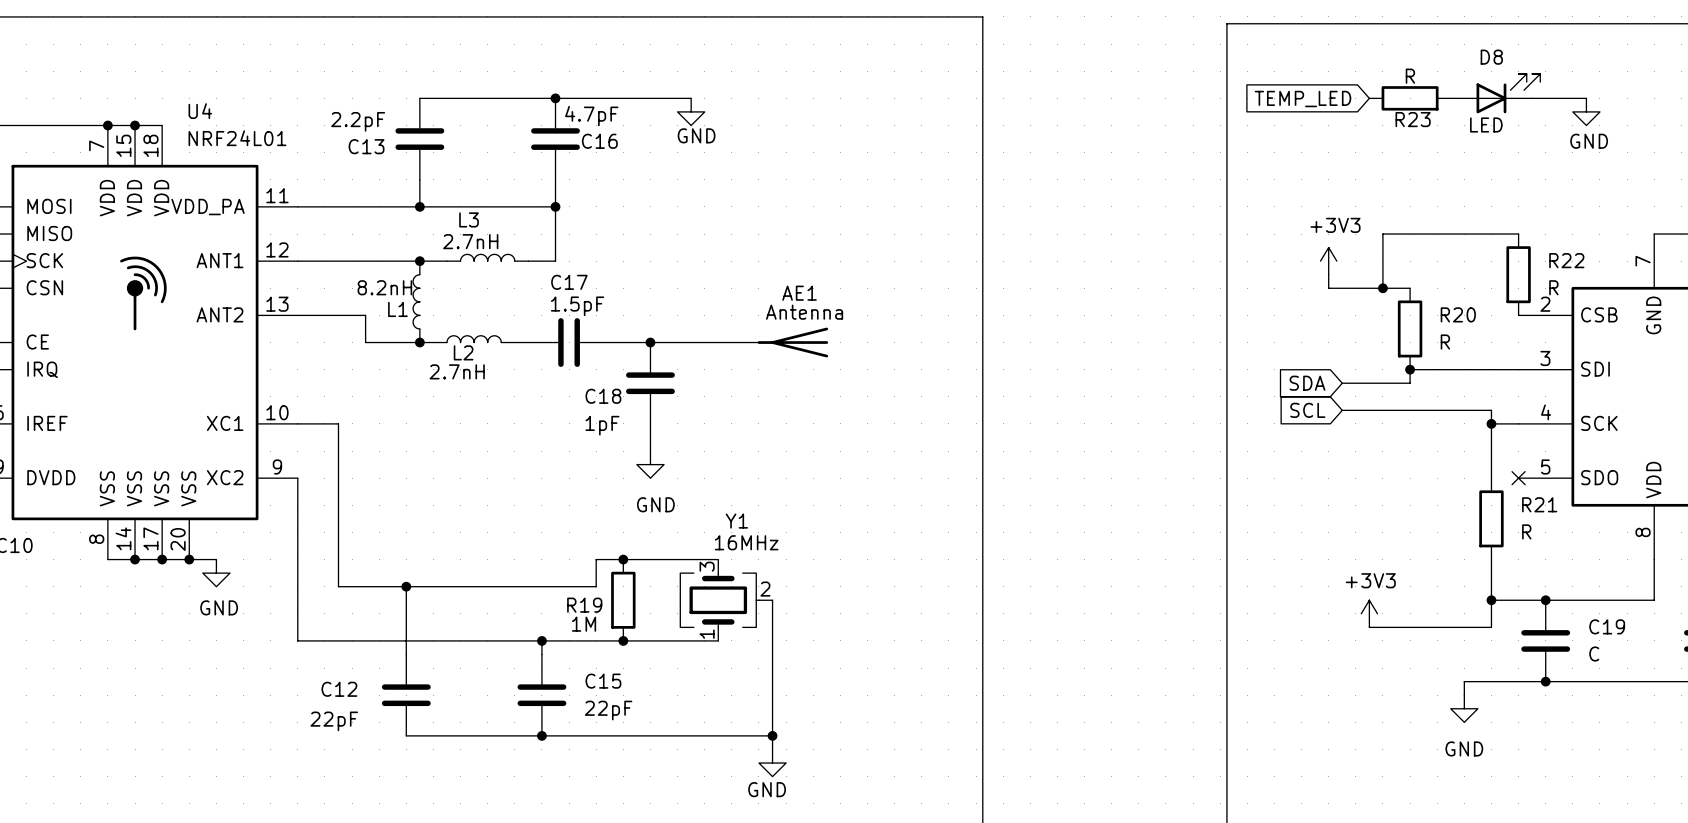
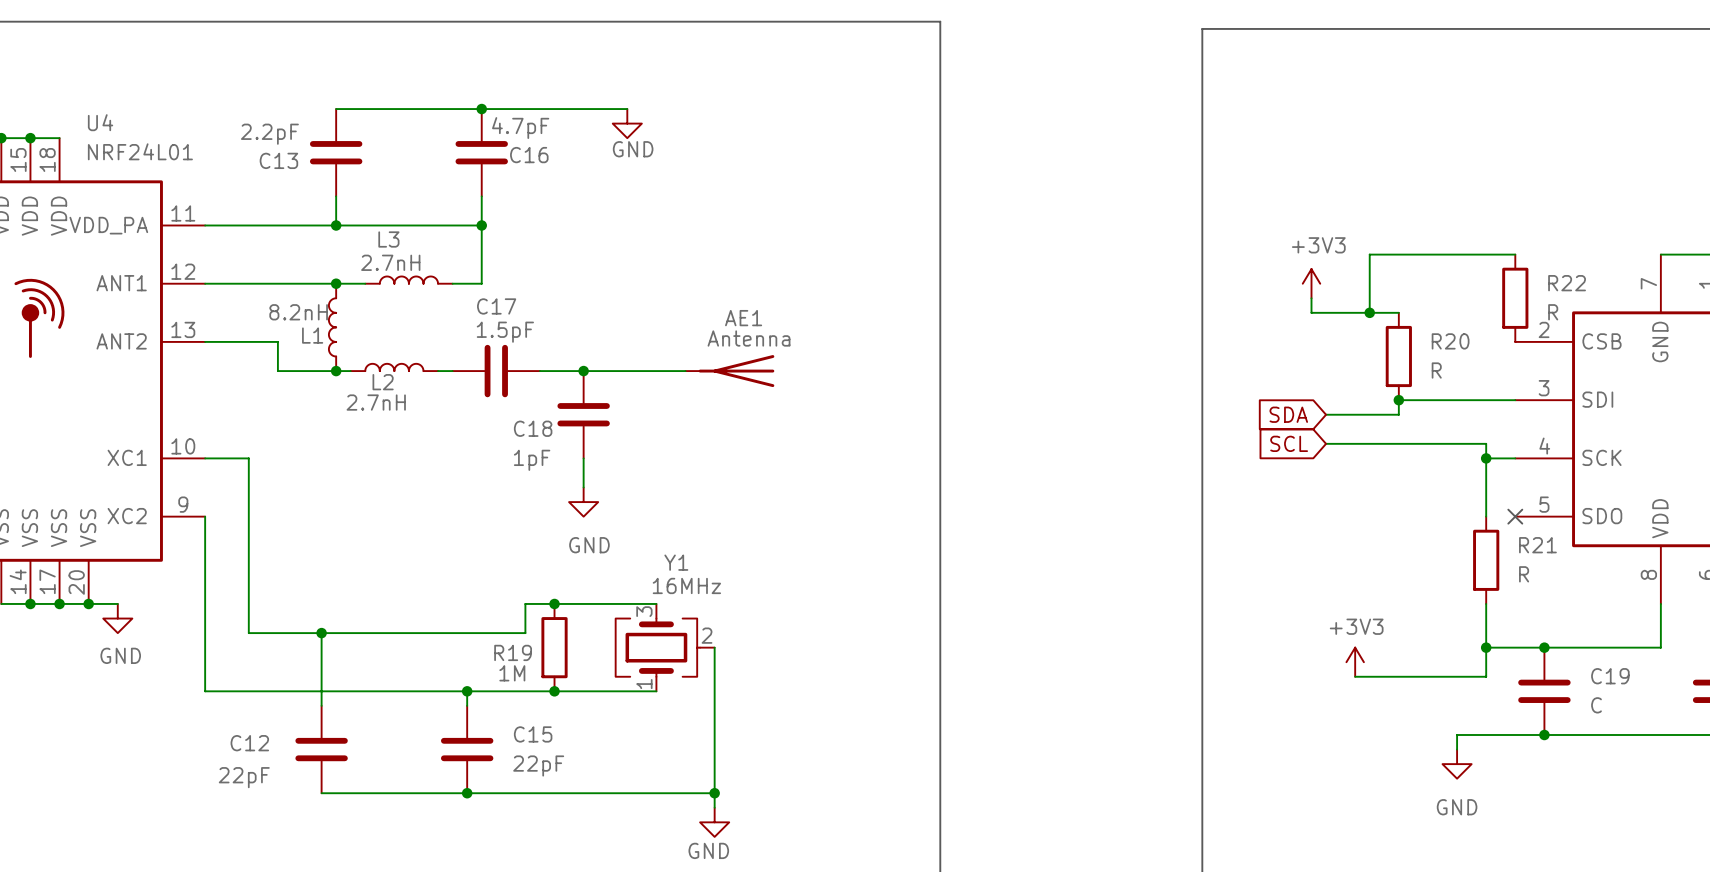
D8: LED (1495, 93) -> none
R23: R (1410, 98) -> none
wire: (1532, 98) (1586, 98) -> none
global label: TEMP_LED (1302, 99) -> none
power symbol: GND (1586, 111) -> none

